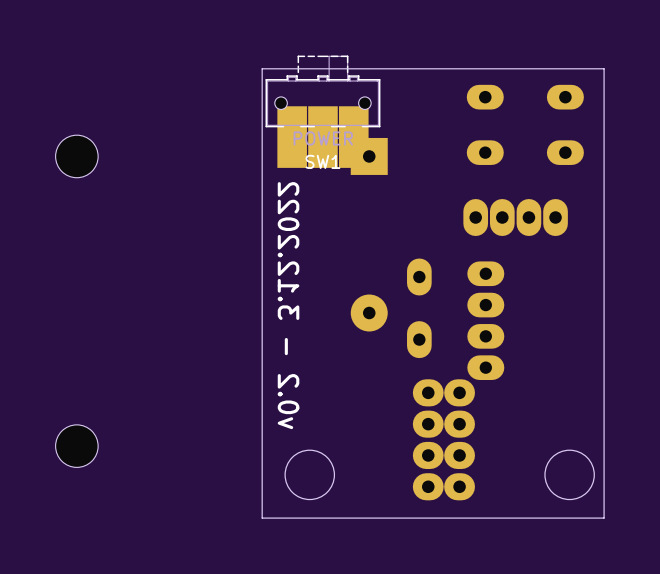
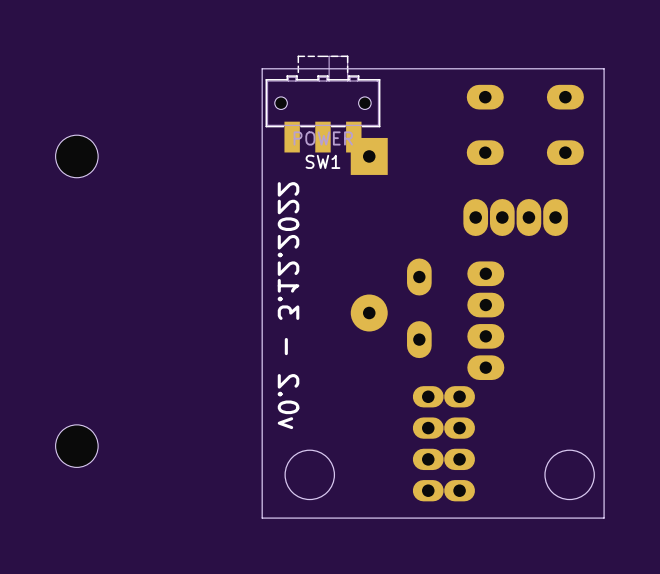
SW1 footprint: [265, 55, 381, 168] -> [265, 55, 381, 153]
part footprint: [412, 379, 475, 501] -> [412, 386, 475, 502]

